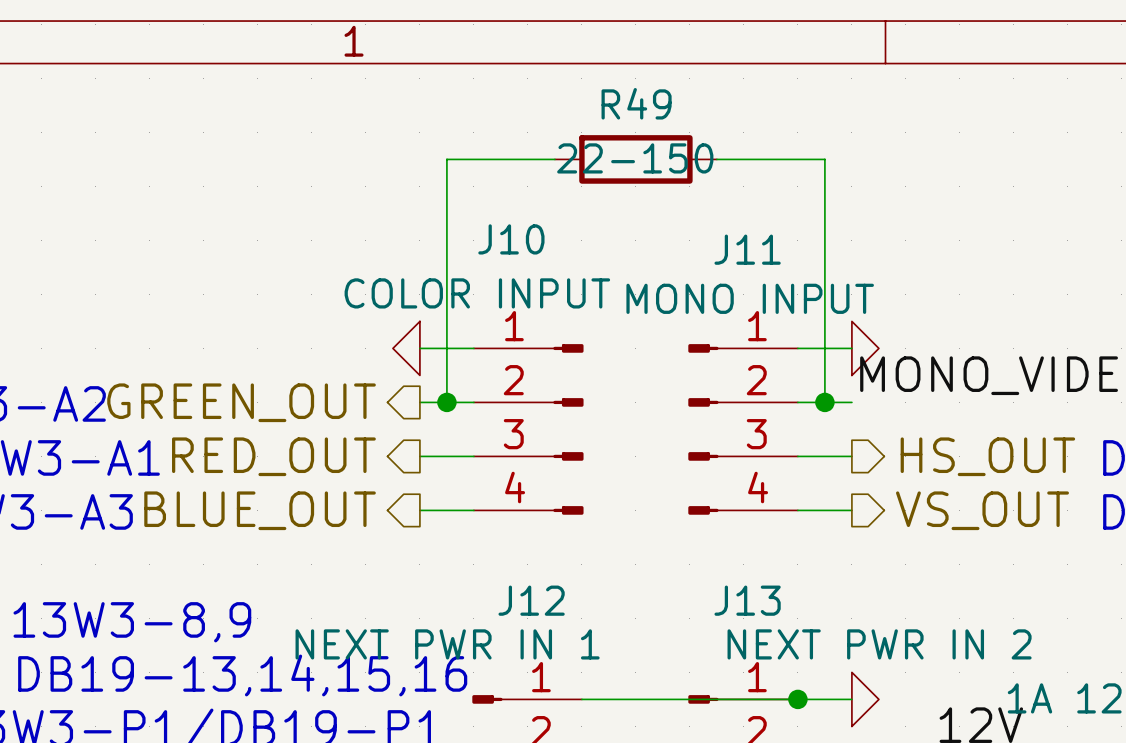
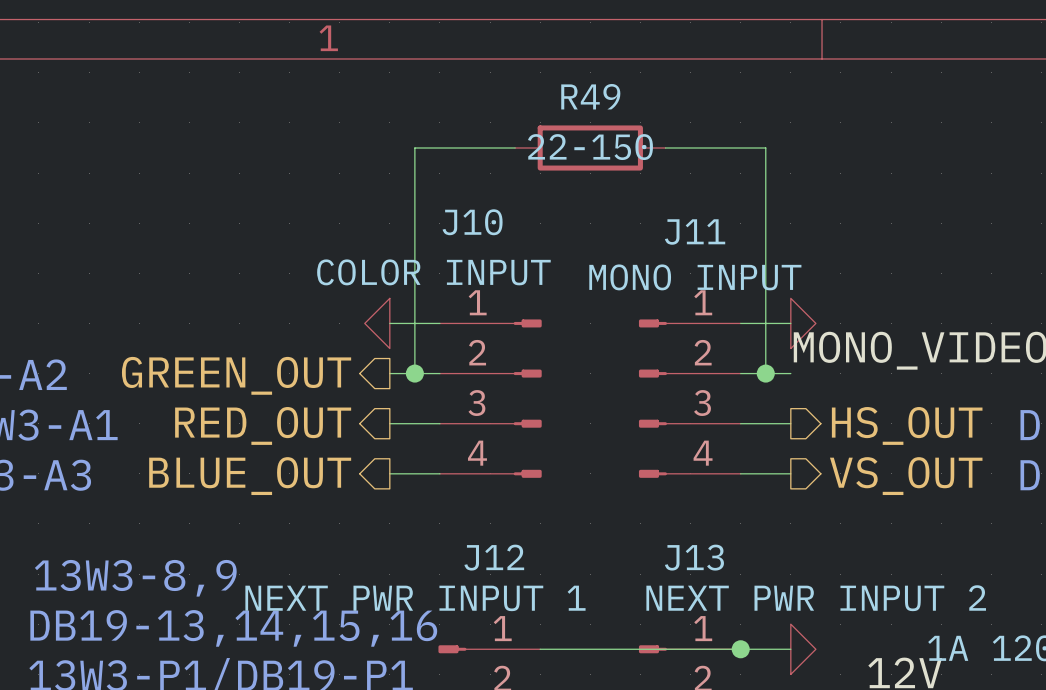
J12 value: NEXT PWR IN 1 (447, 644) -> NEXT PWR INPUT 1 (415, 598)
J13 value: NEXT PWR IN 2 (879, 644) -> NEXT PWR INPUT 2 (816, 598)

